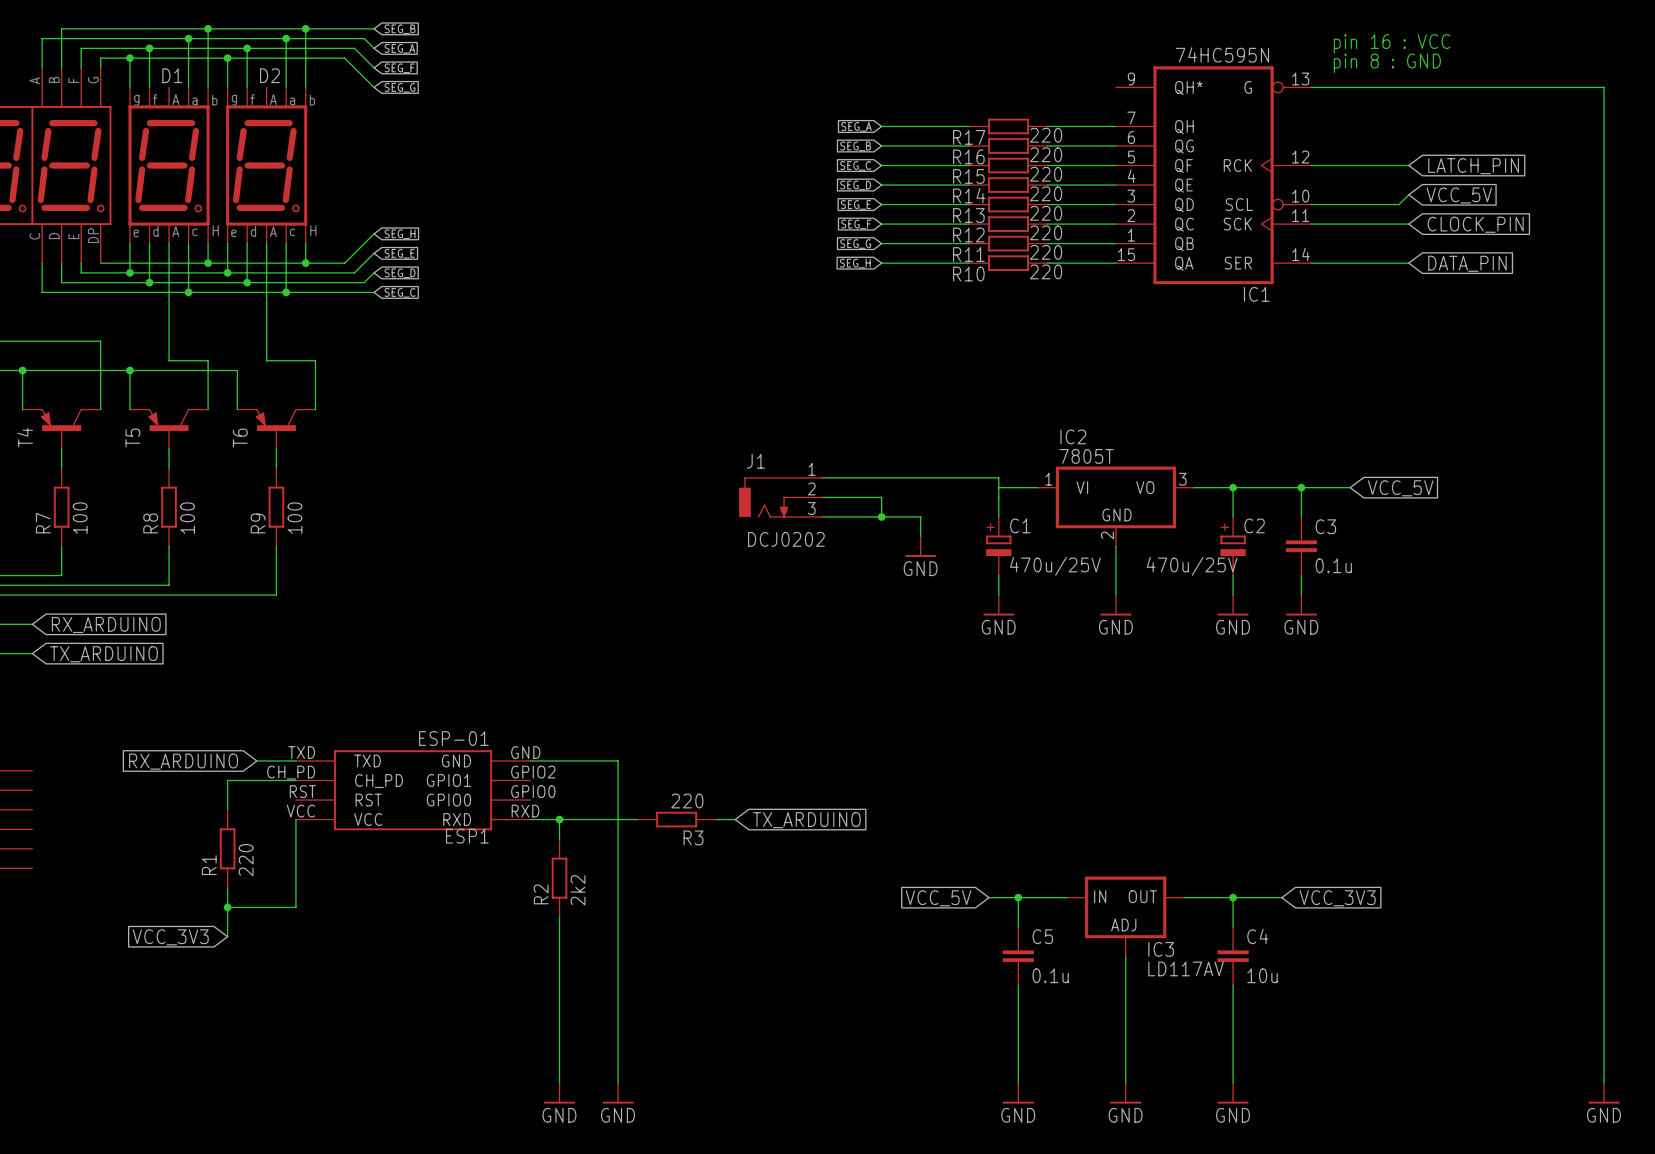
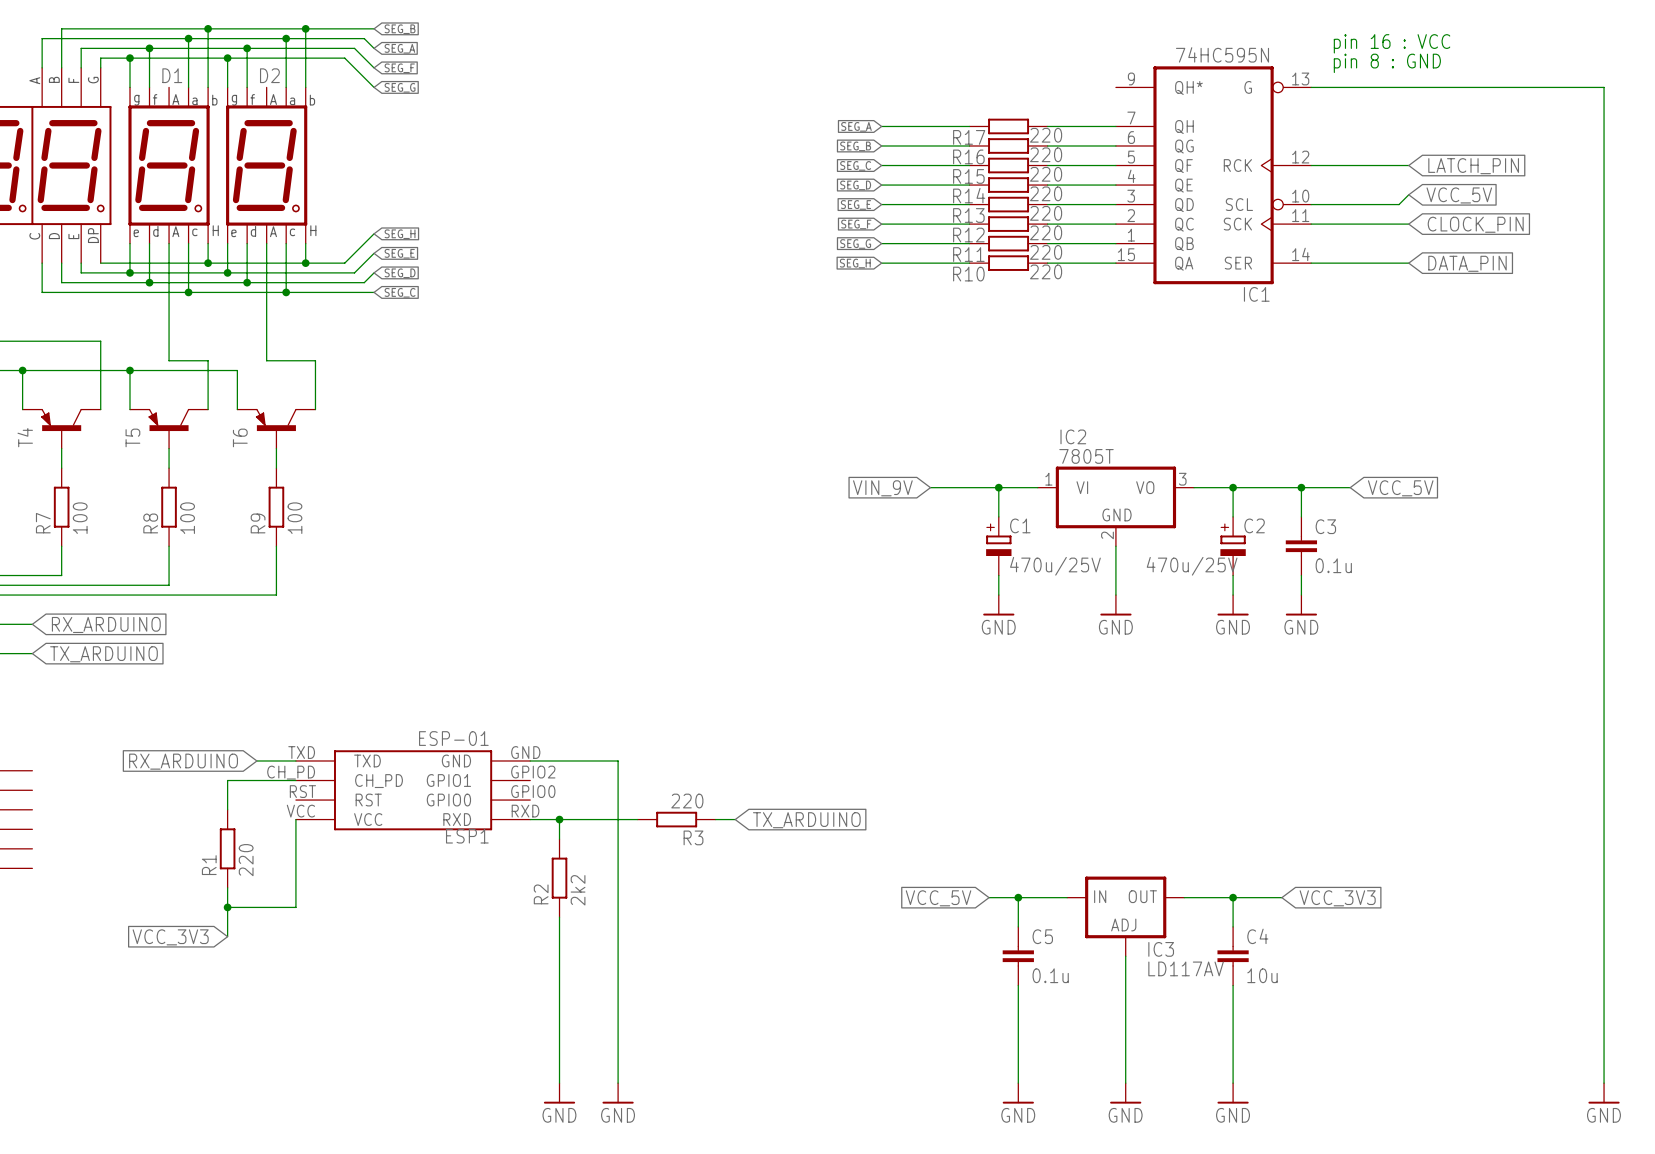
wire: (823, 477) (998, 477) (998, 487) -> (930, 487) (998, 487)
junction: none -> (998, 487)
global label: none -> VIN_9V (882, 488)
J1: DCJ0202 (781, 497) -> none
wire: (823, 497) (881, 497) (881, 516) -> none
wire: (823, 516) (920, 516) (920, 536) -> none
junction: (881, 516) -> none
power symbol: GND (920, 546) -> none

